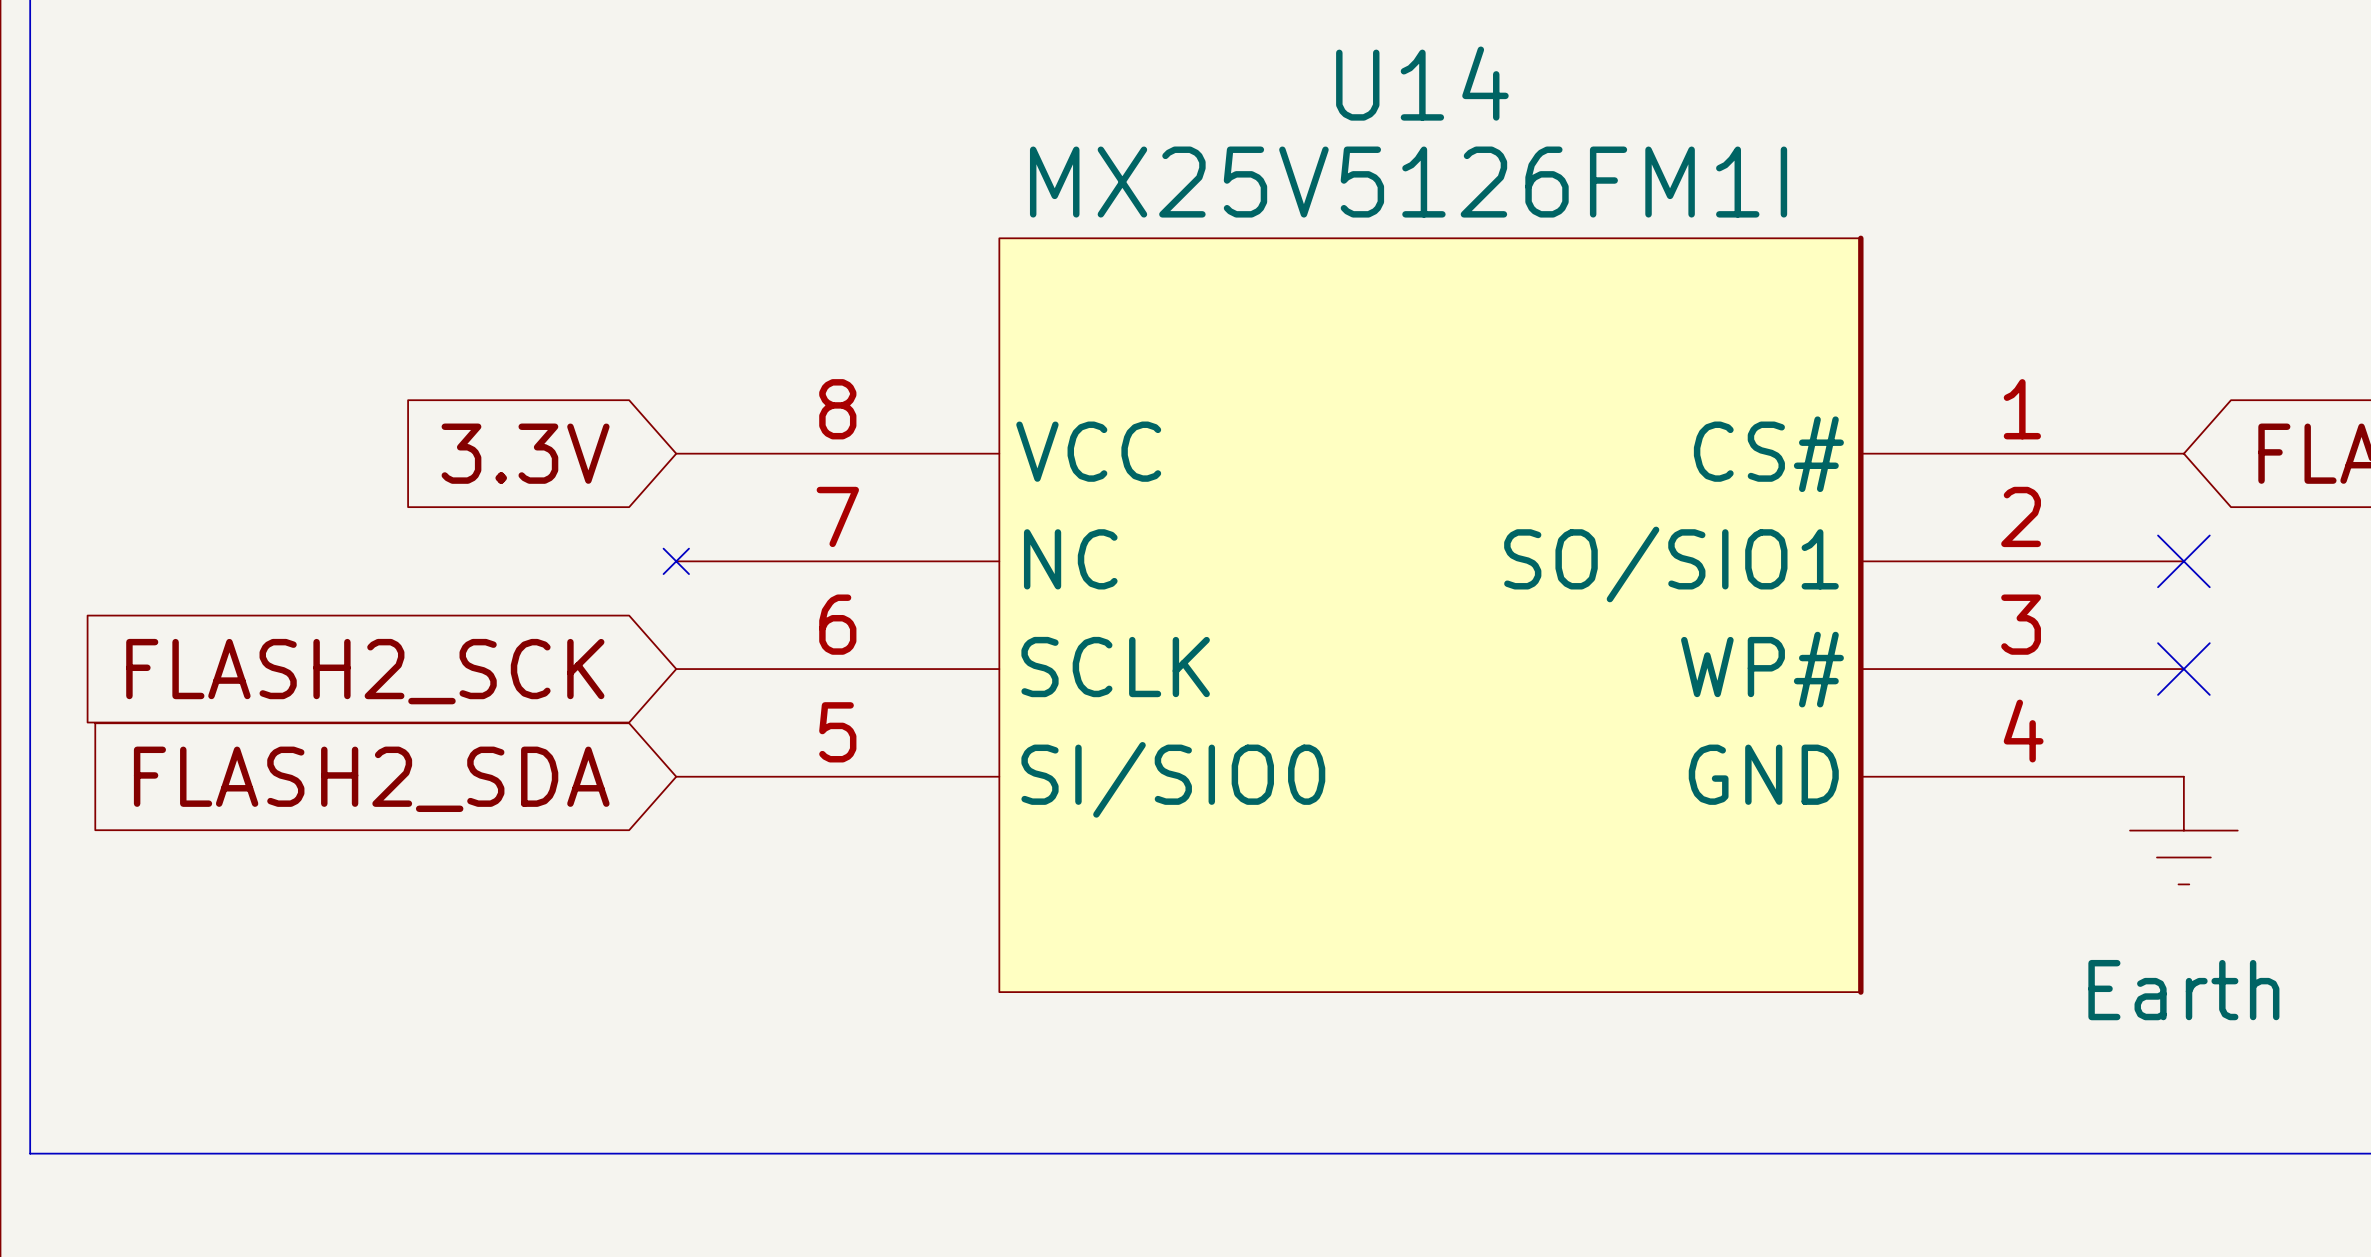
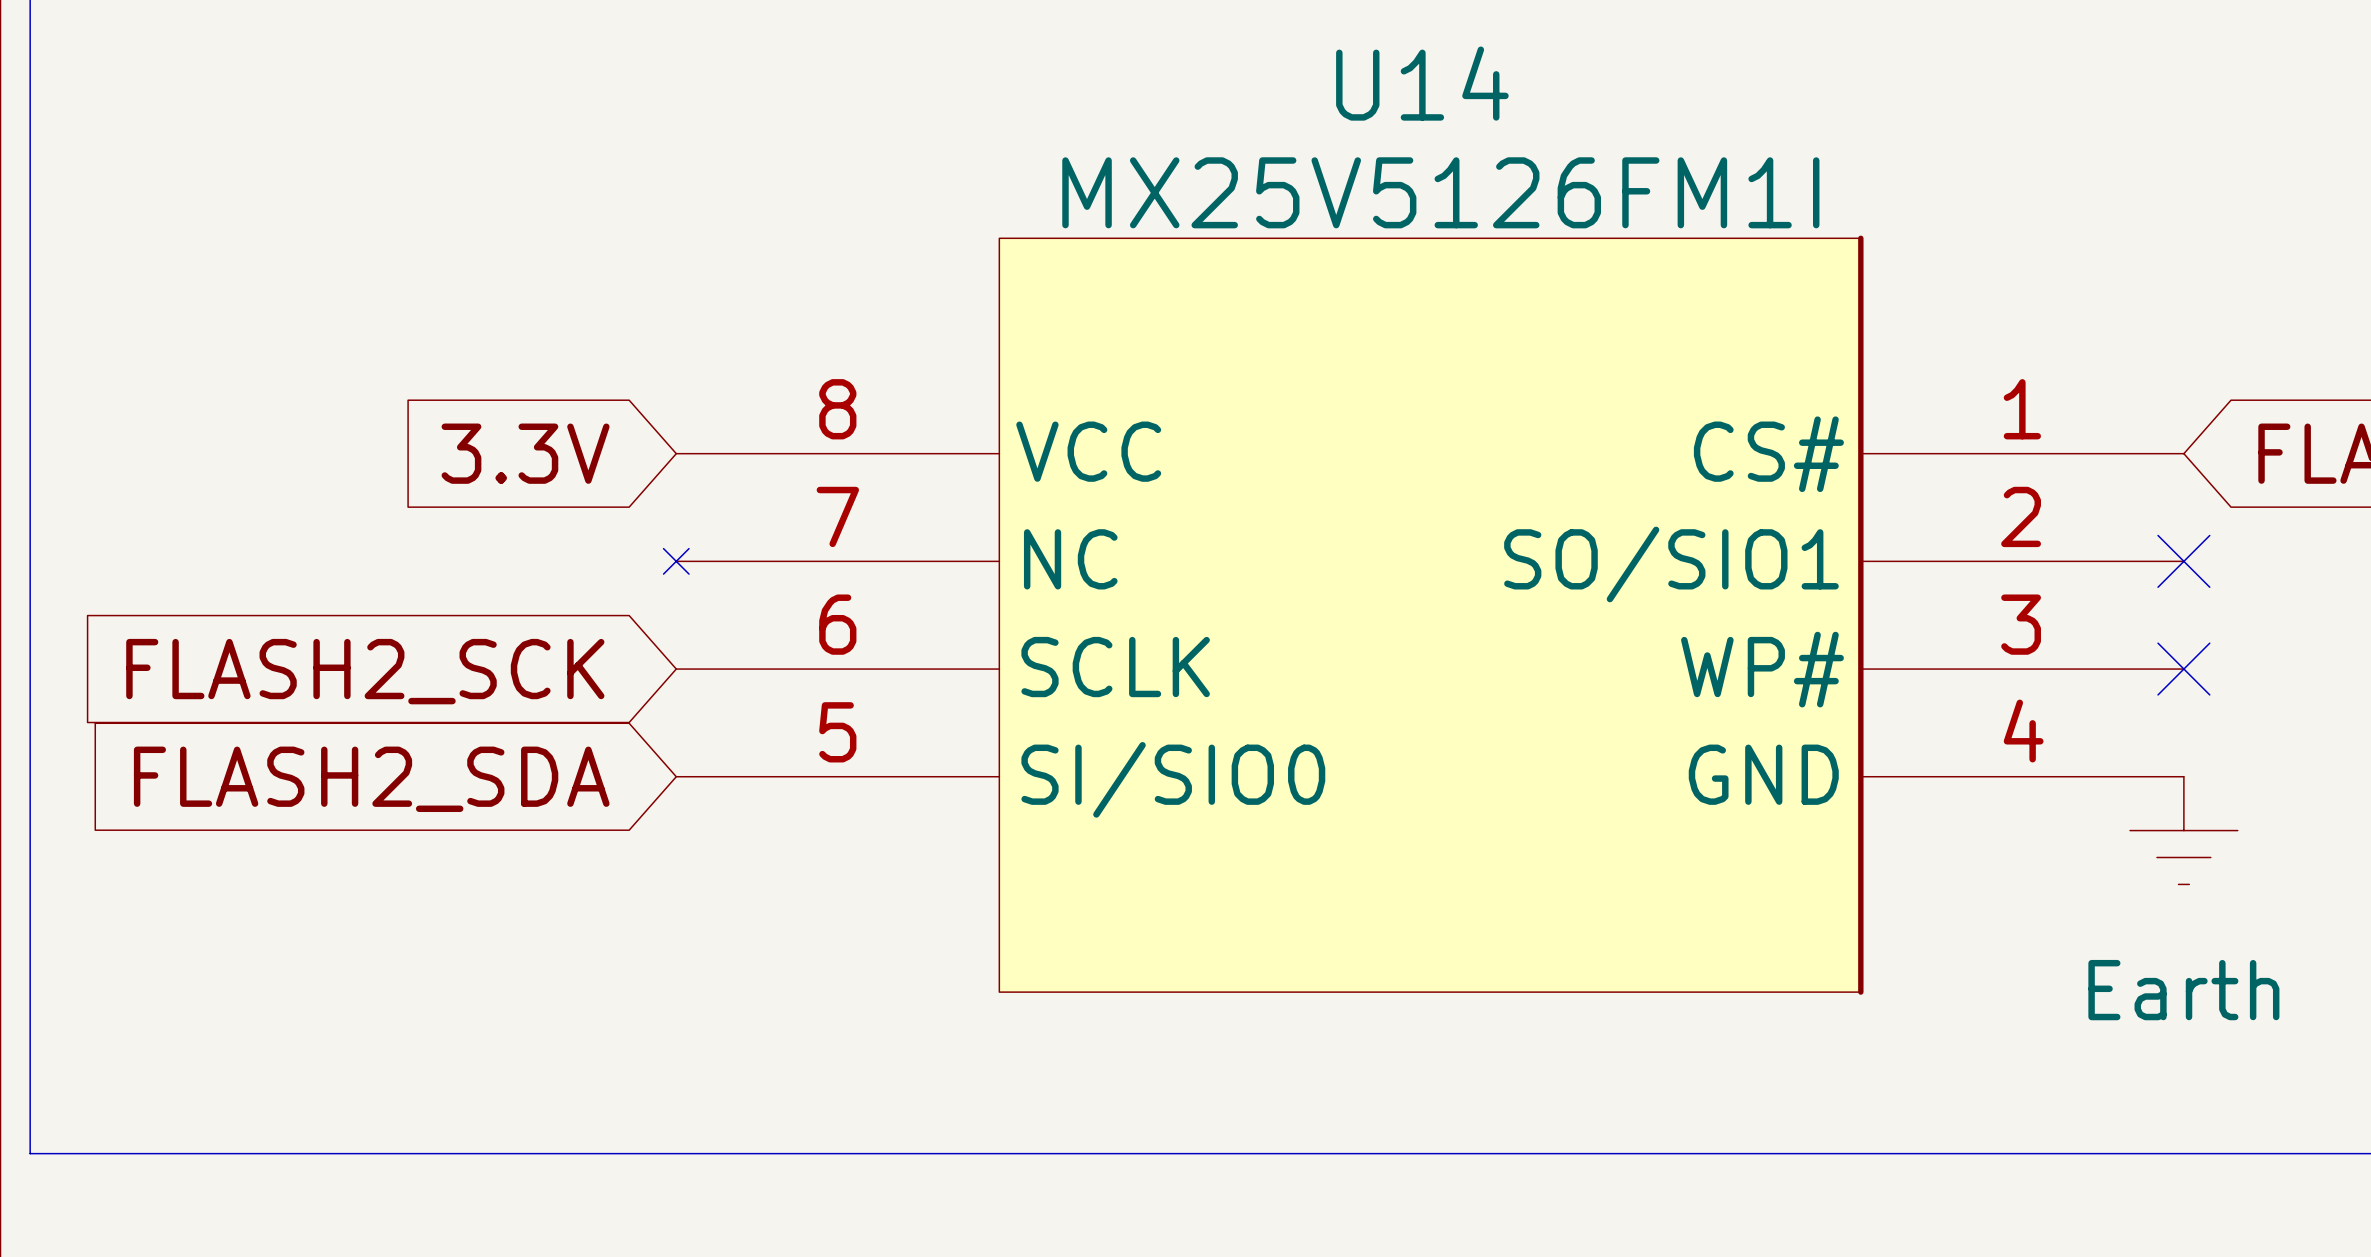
U14 value position: MX25V5126FM1I (1408, 182) -> MX25V5126FM1I (1440, 192)

